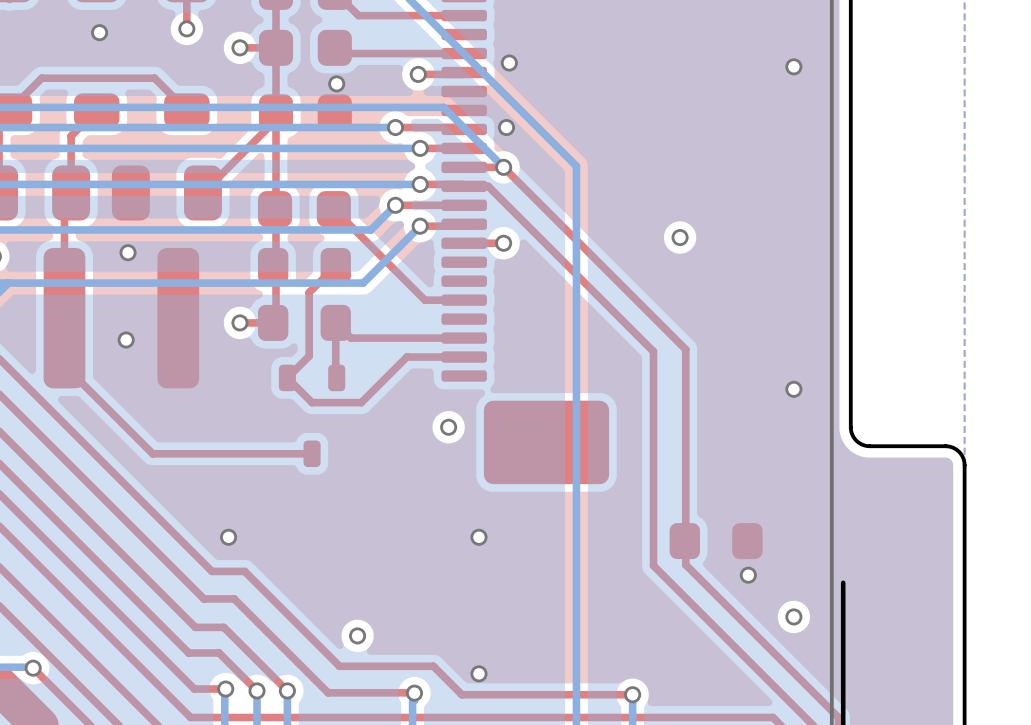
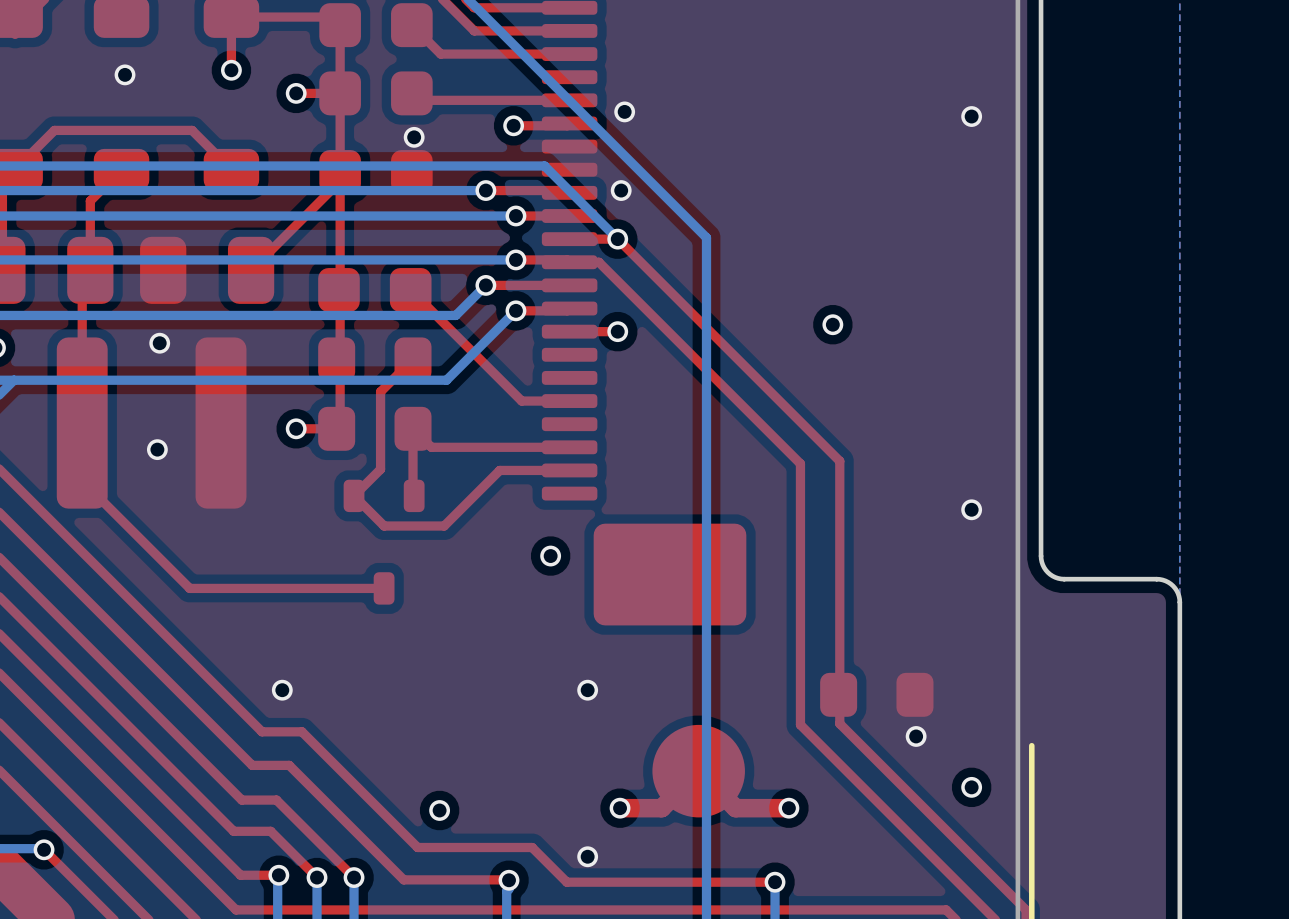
part: none -> (698, 771)
via: none -> (620, 808)
top track: none -> (788, 808) (735, 808) (698, 771) (661, 808) (620, 808)
via: none -> (788, 808)

